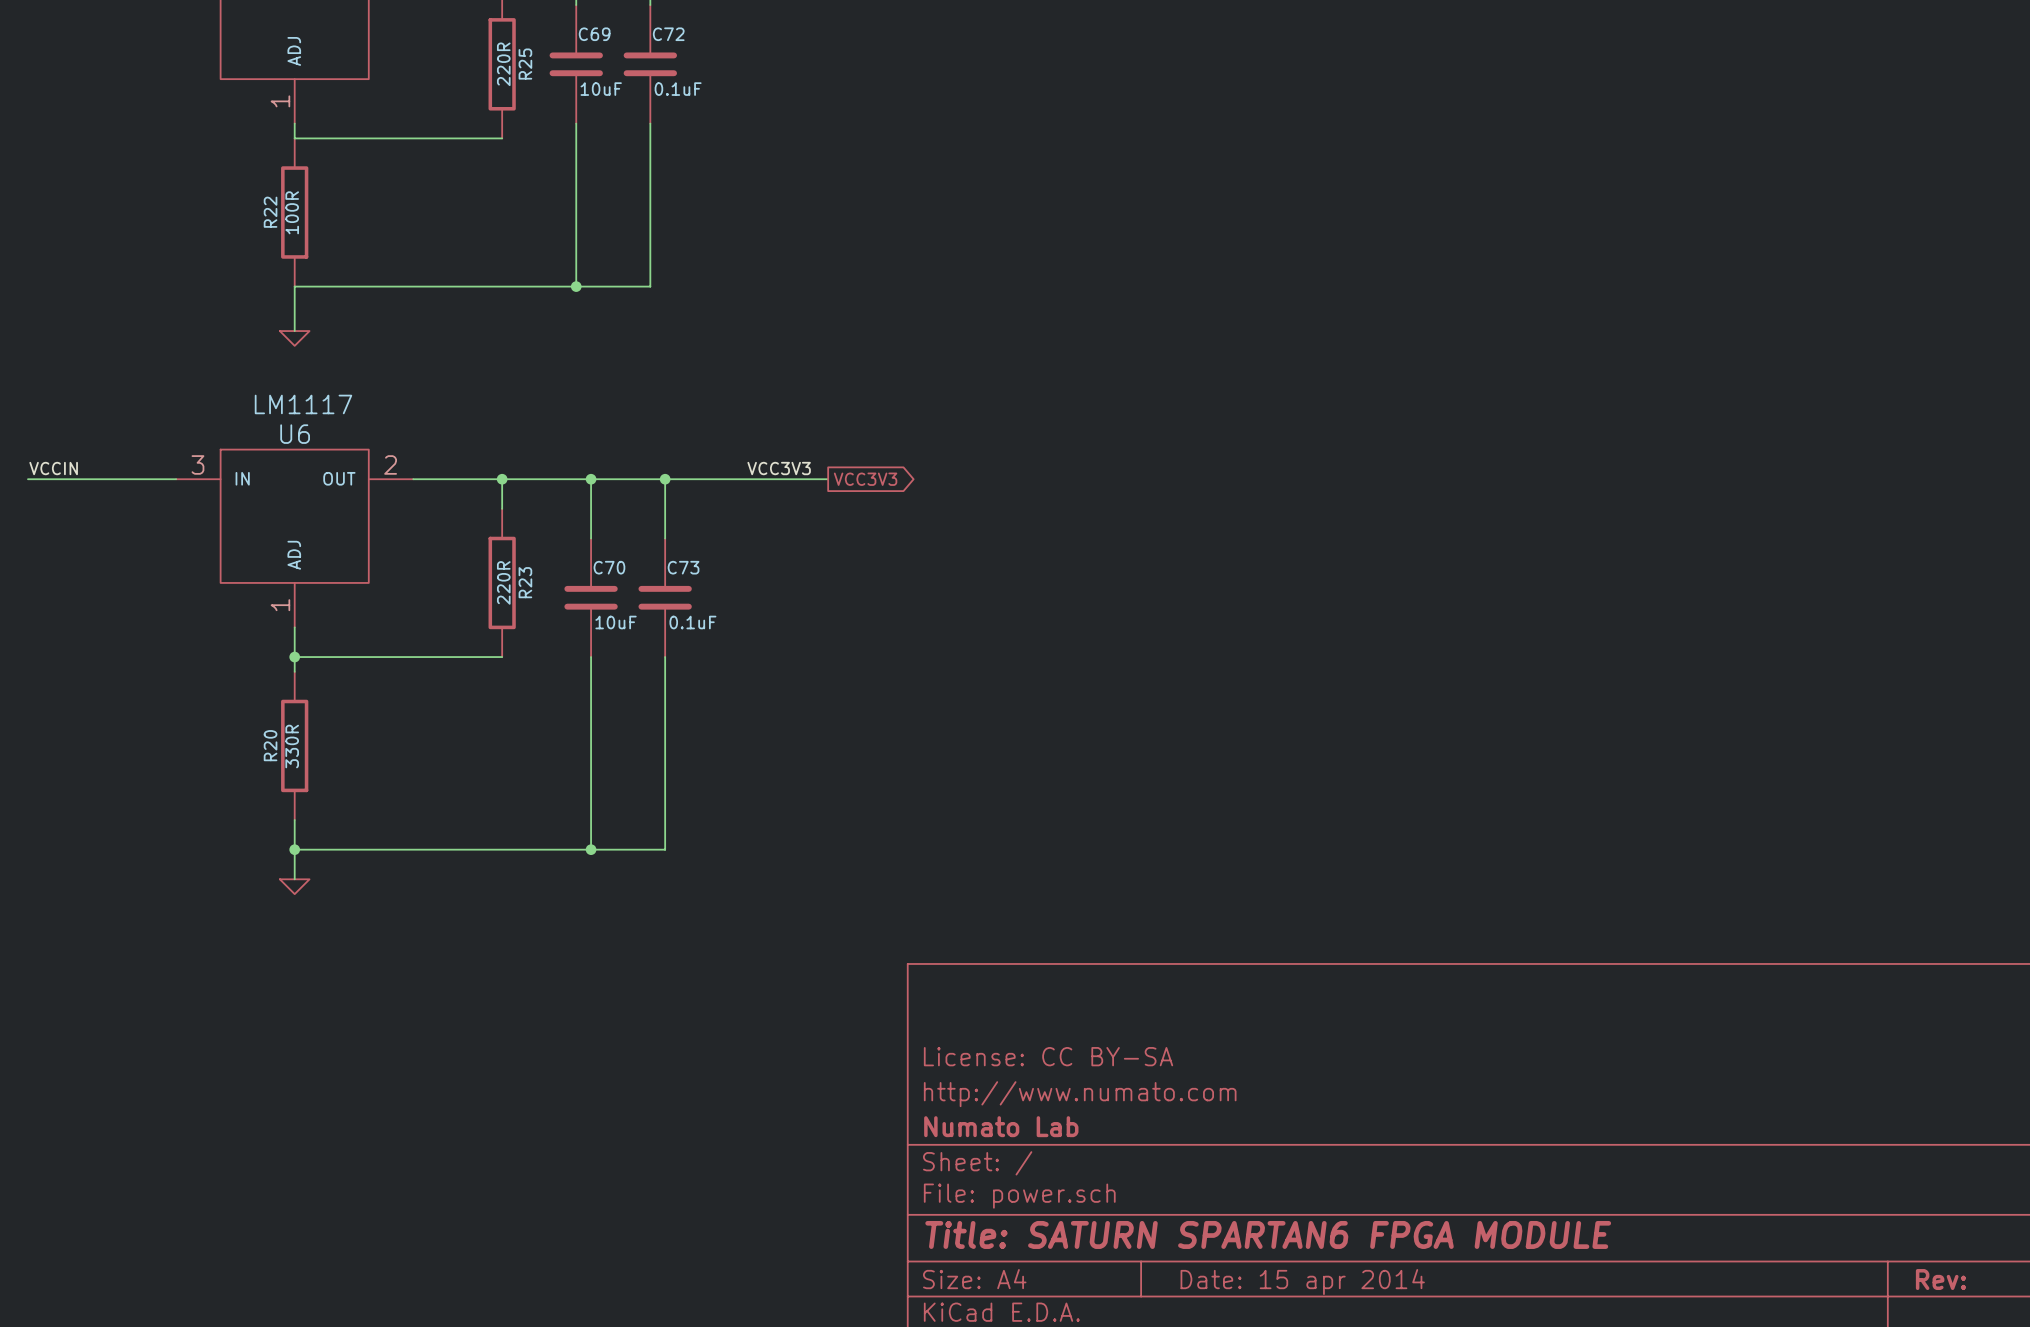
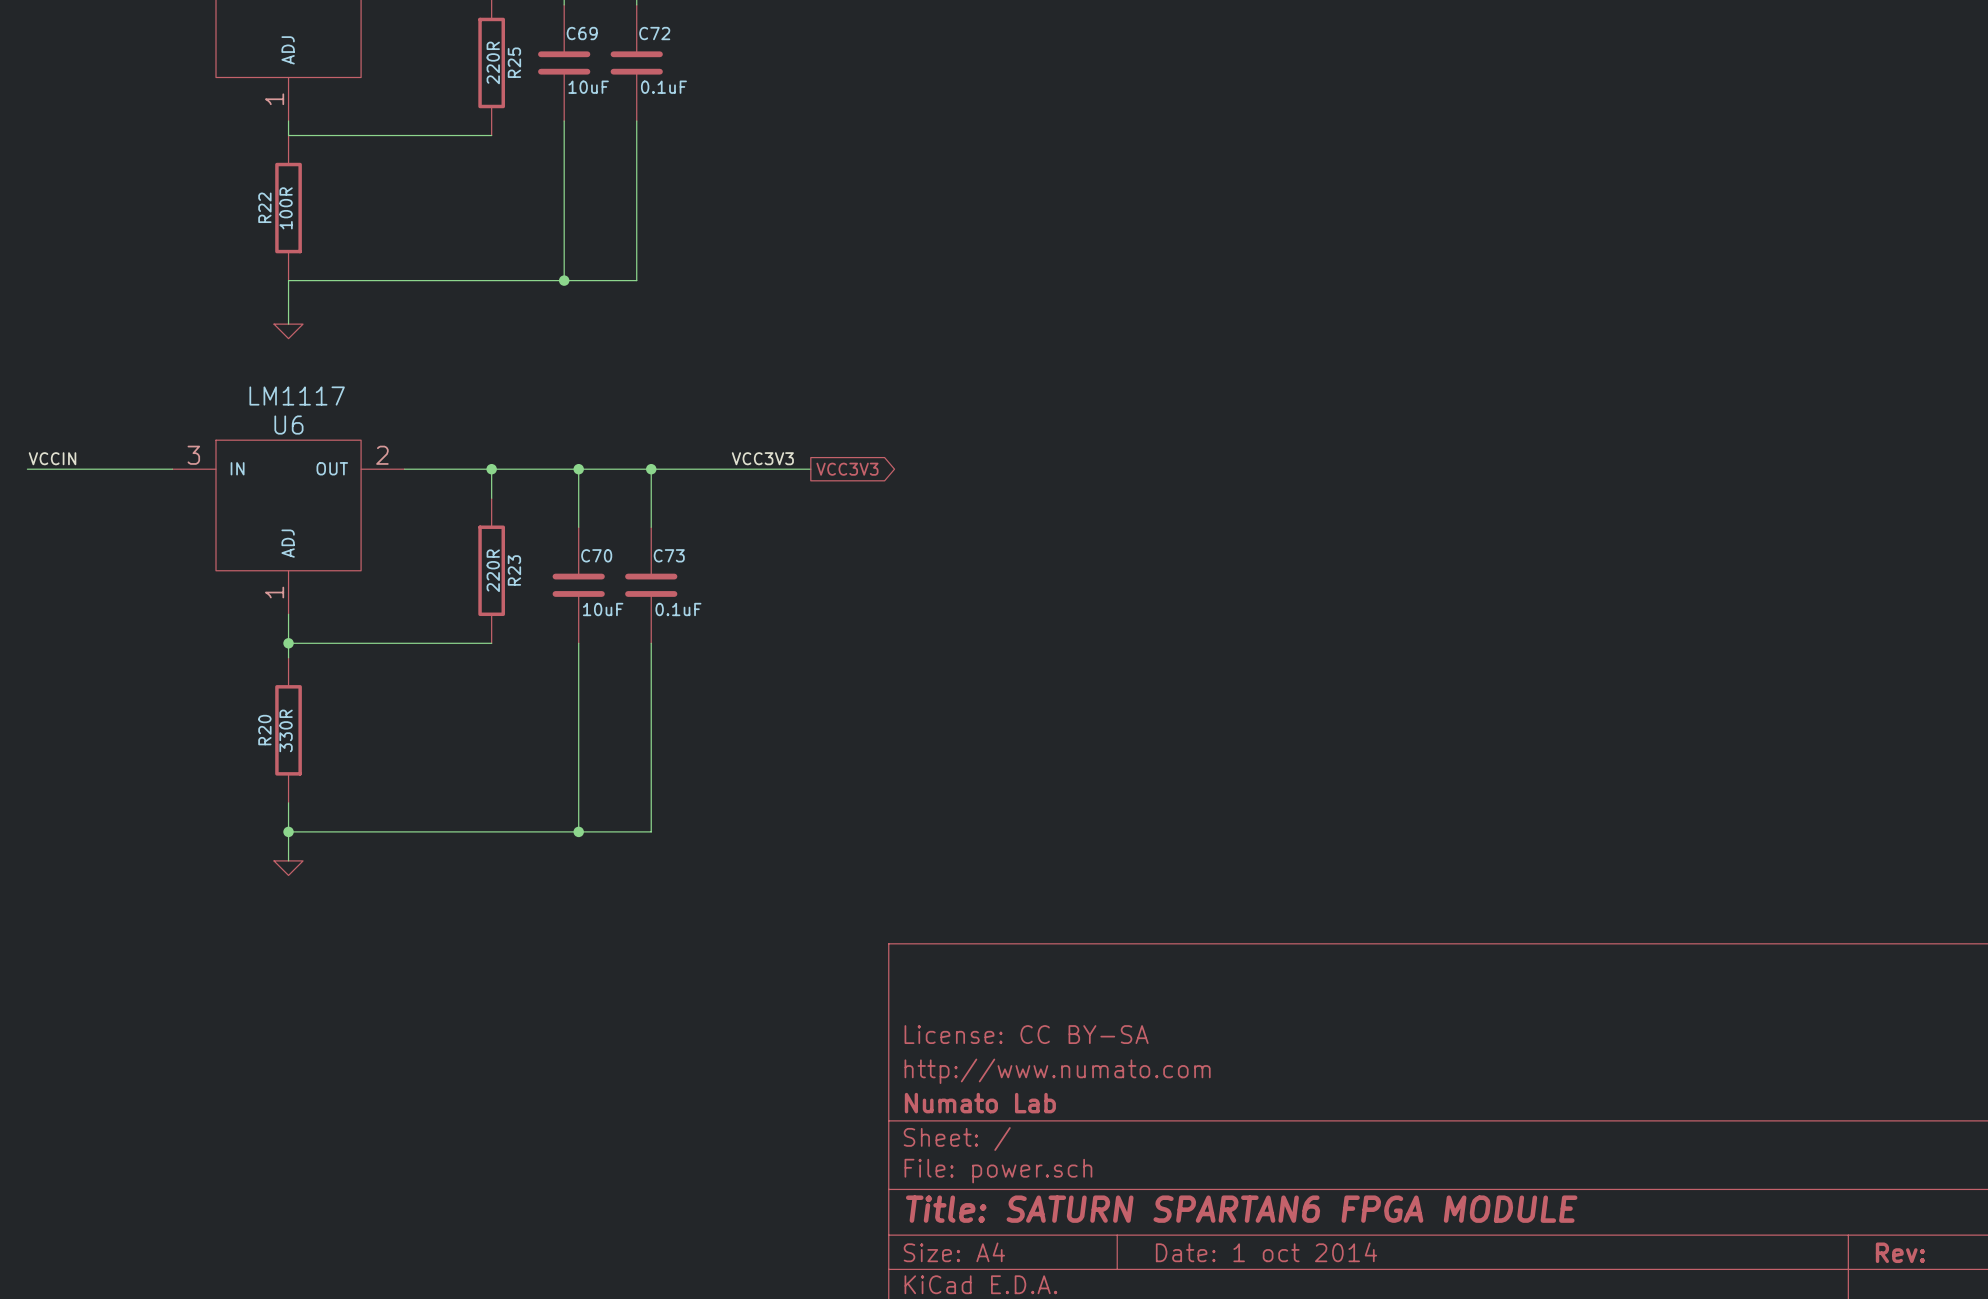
title block: Date: 15 apr 2014 (1302, 1282) -> Date: 1 oct 2014 (1266, 1252)

